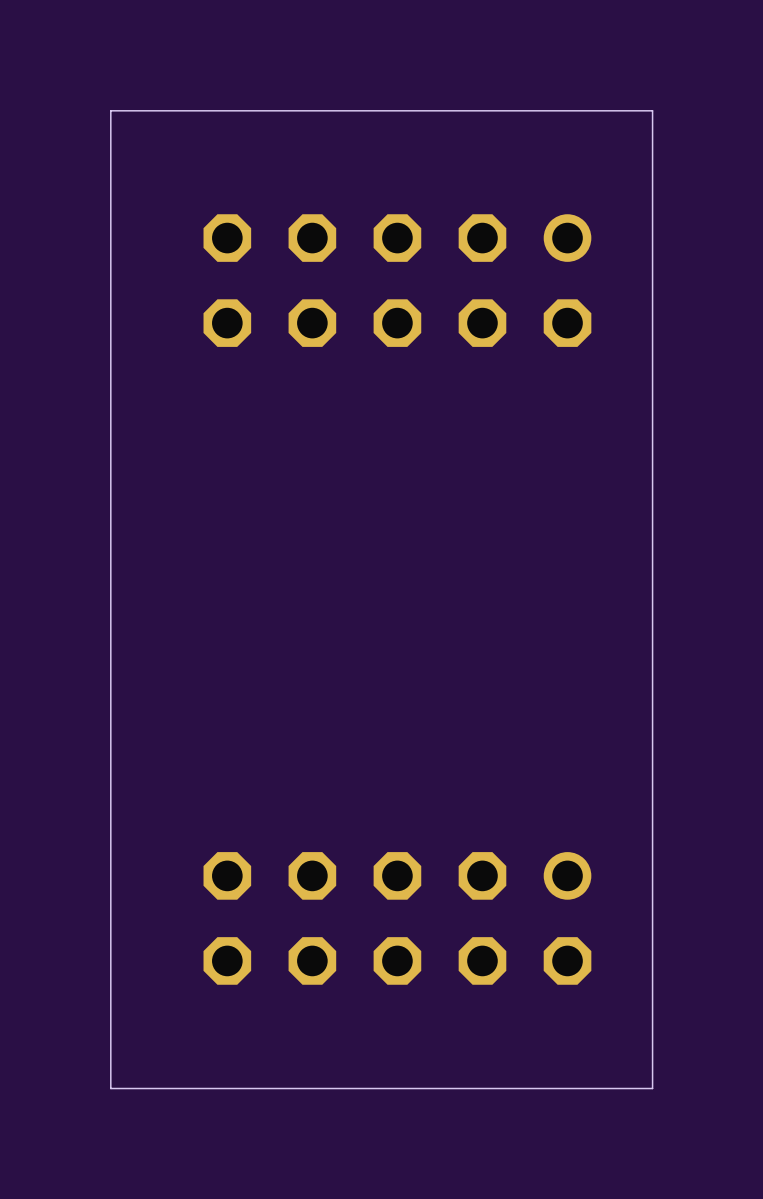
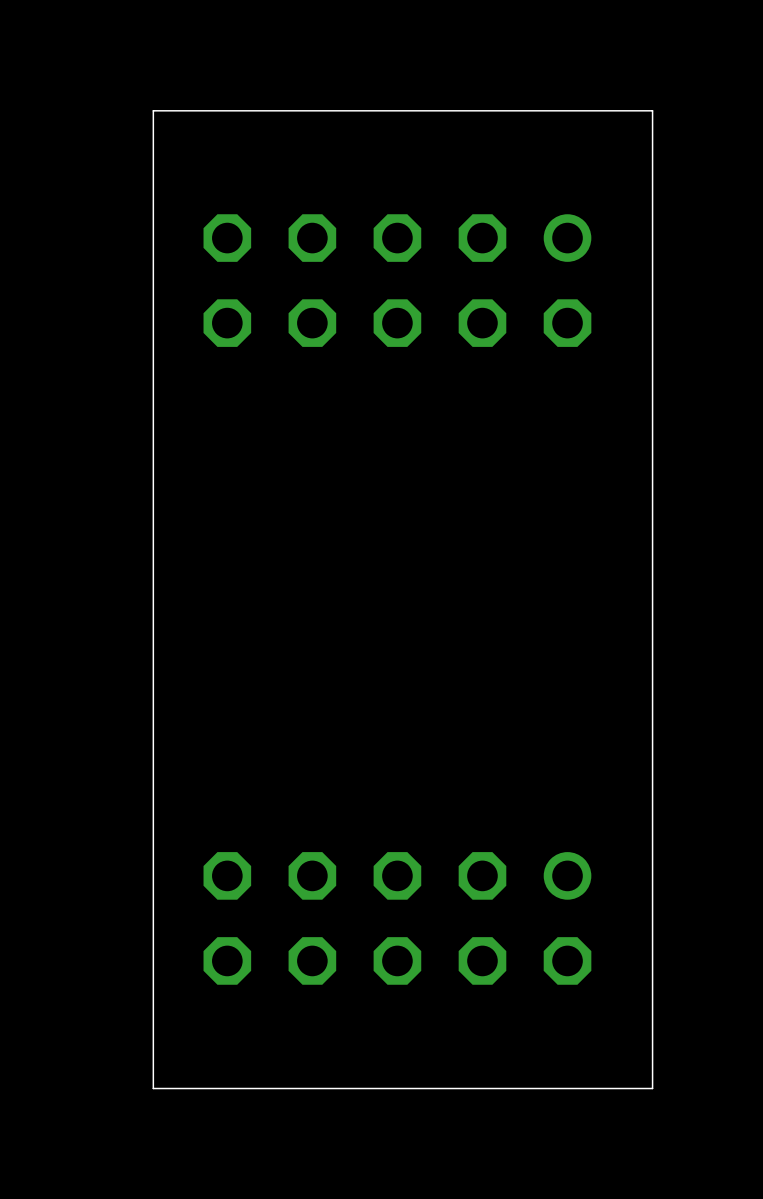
board edge: (153, 110) (110, 110) (110, 1088) (153, 1088) -> (153, 110) (153, 1088)

